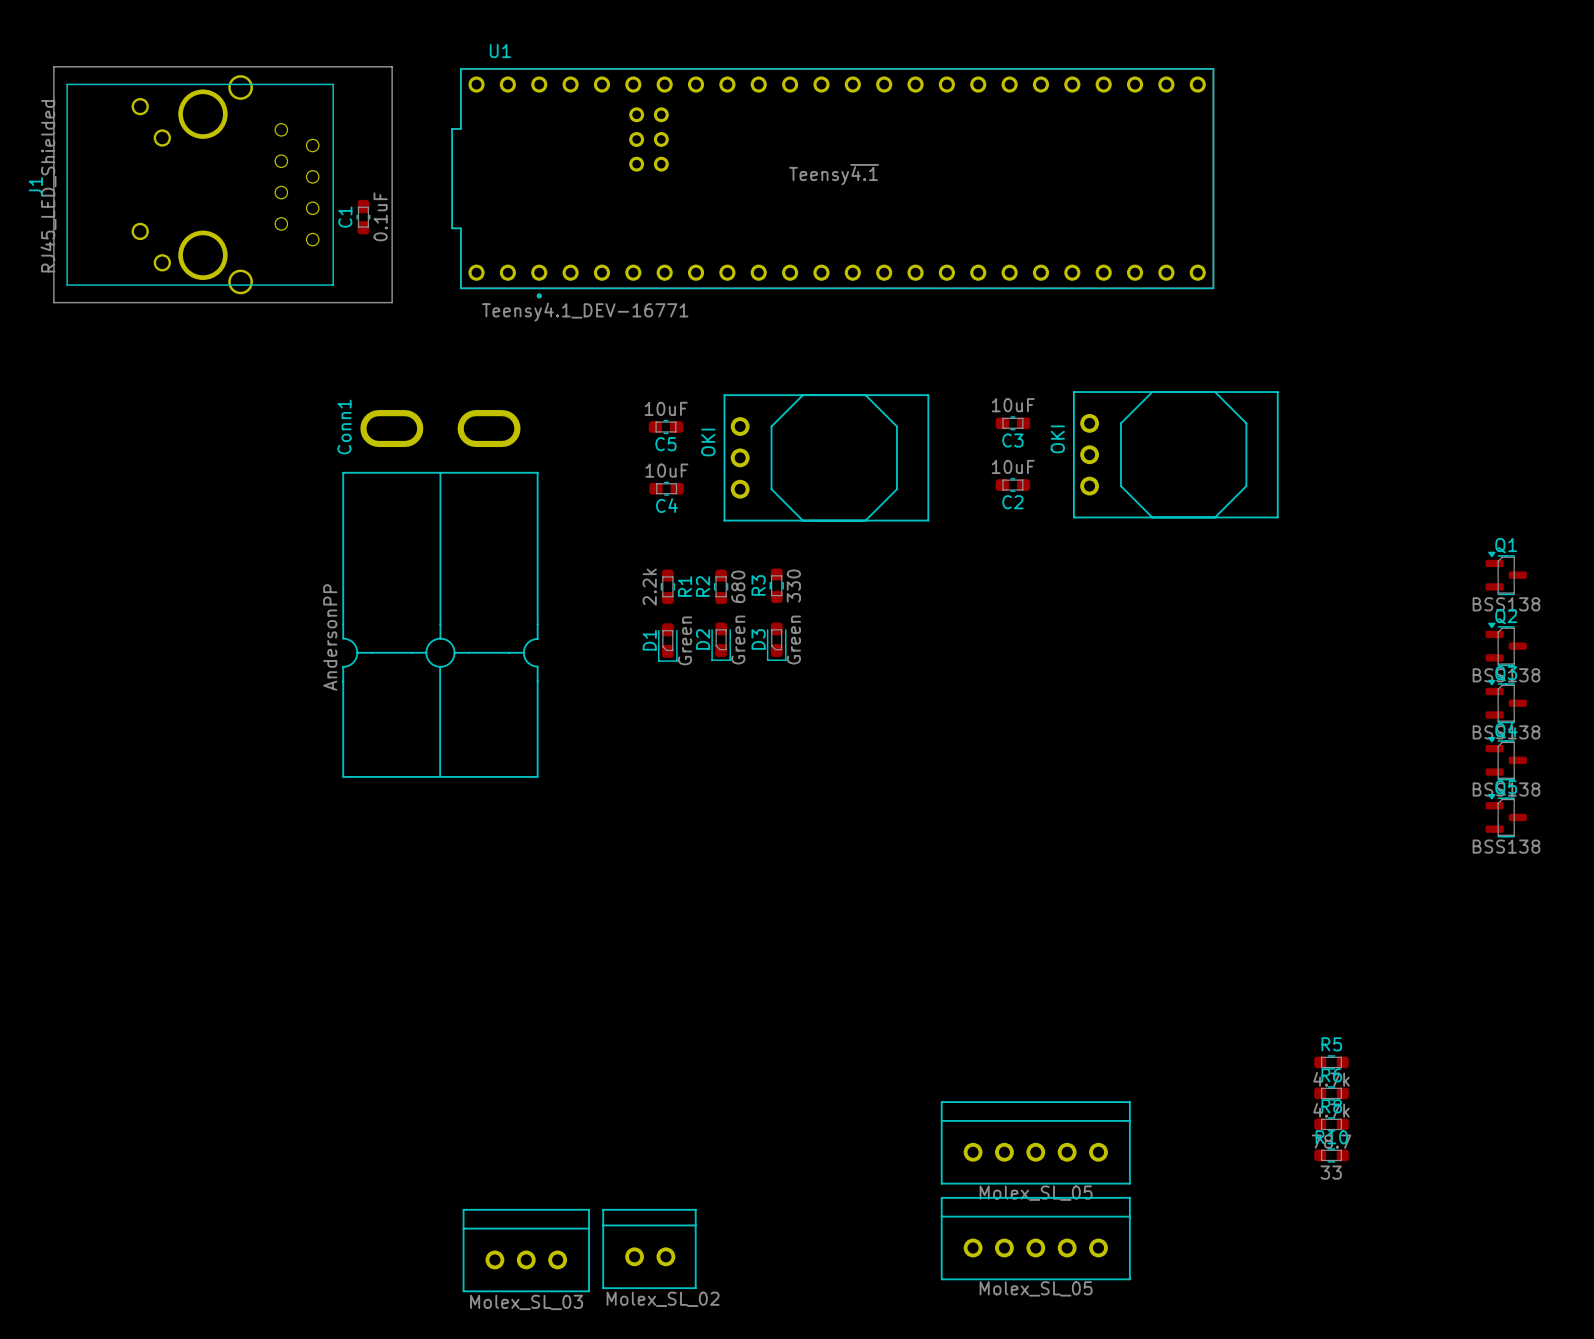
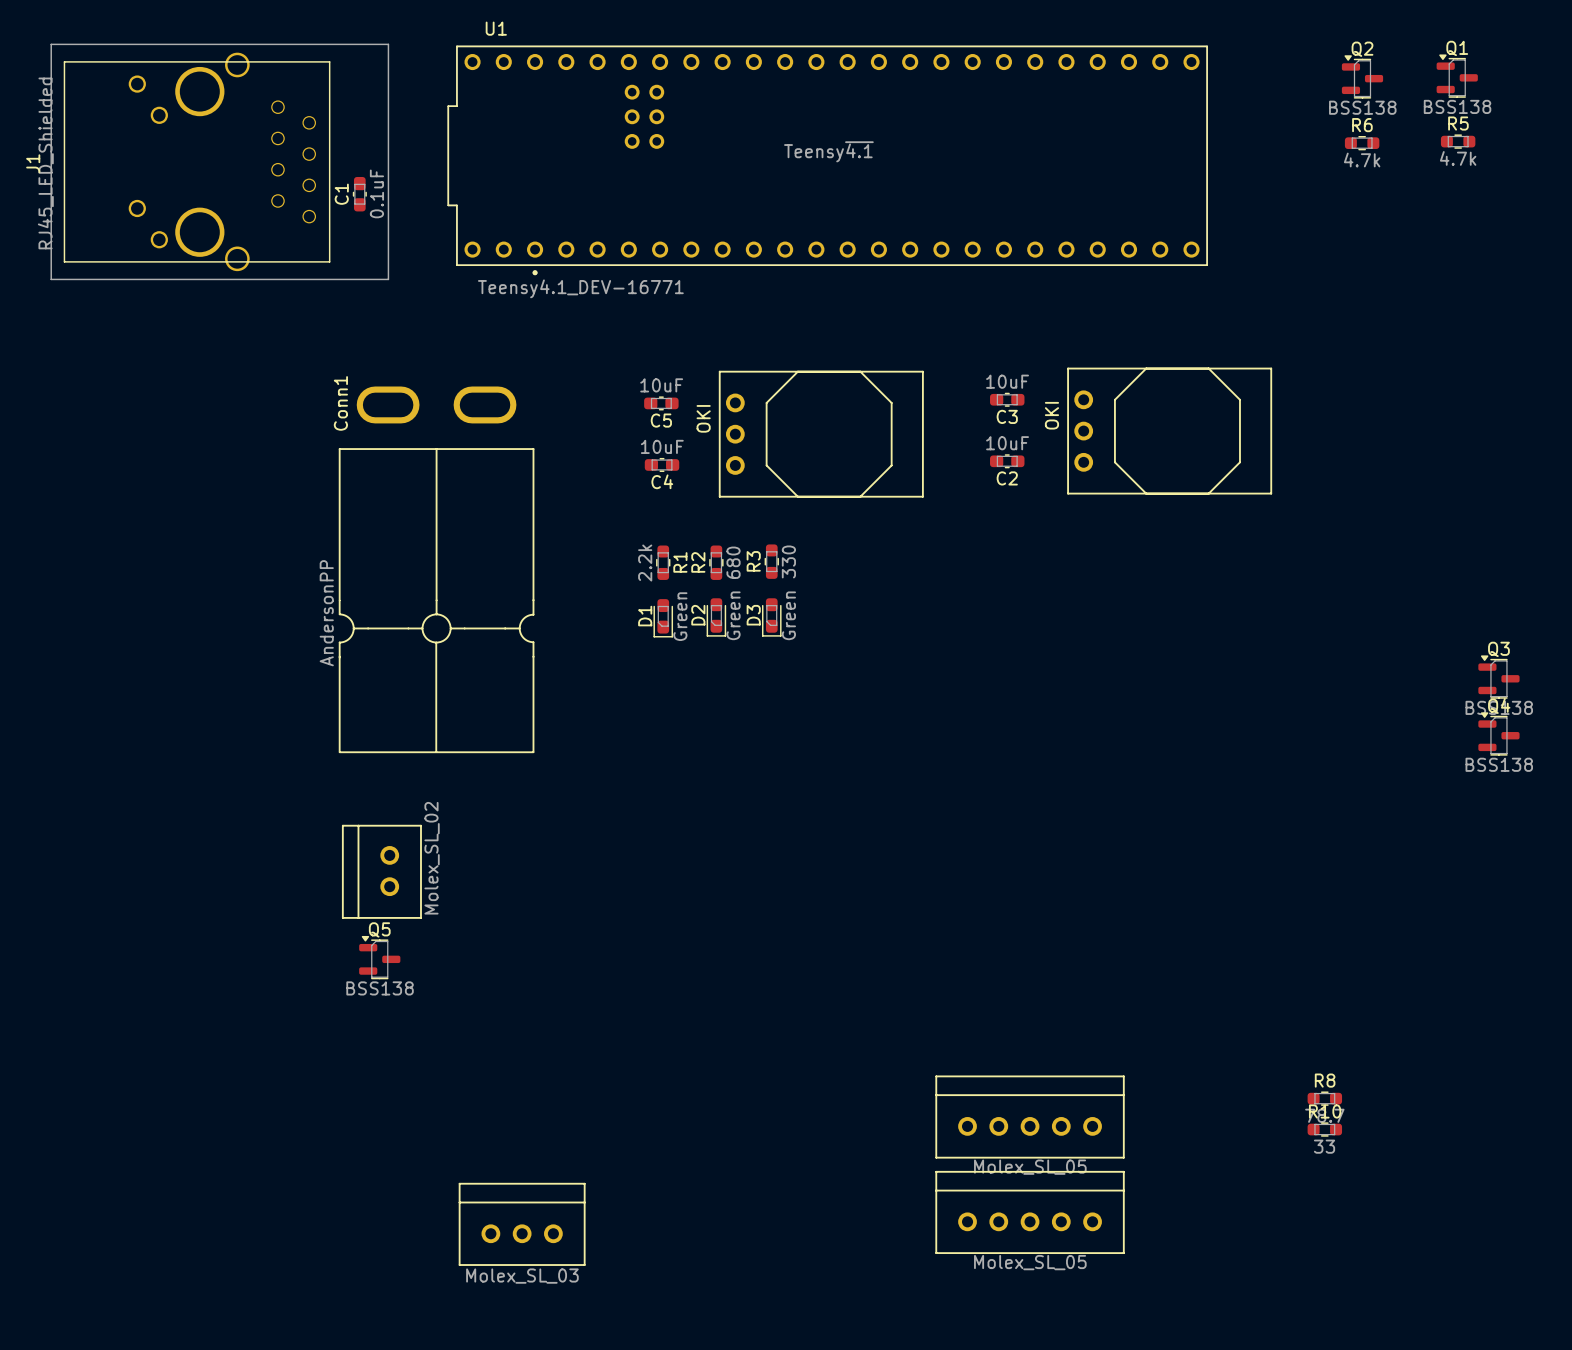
Q1 position: (1506, 573) -> (1457, 76)
Q2 position: (1506, 644) -> (1362, 76)
Q5 position: (1506, 815) -> (379, 957)
part: none -> Molex_SL_02 (381, 871)
R5 position: (1331, 1062) -> (1458, 141)
R6 position: (1331, 1093) -> (1362, 143)
part: Molex_SL_02 (649, 1248) -> none

